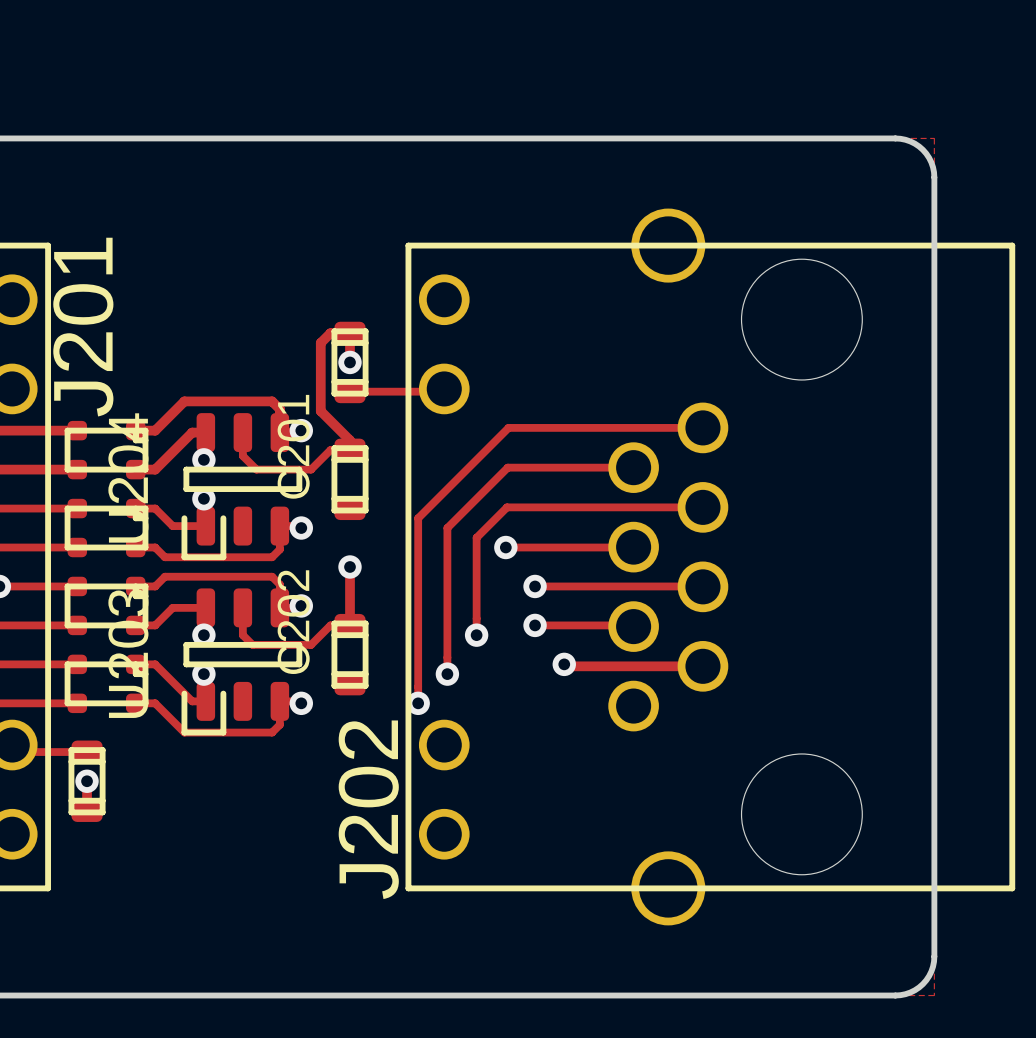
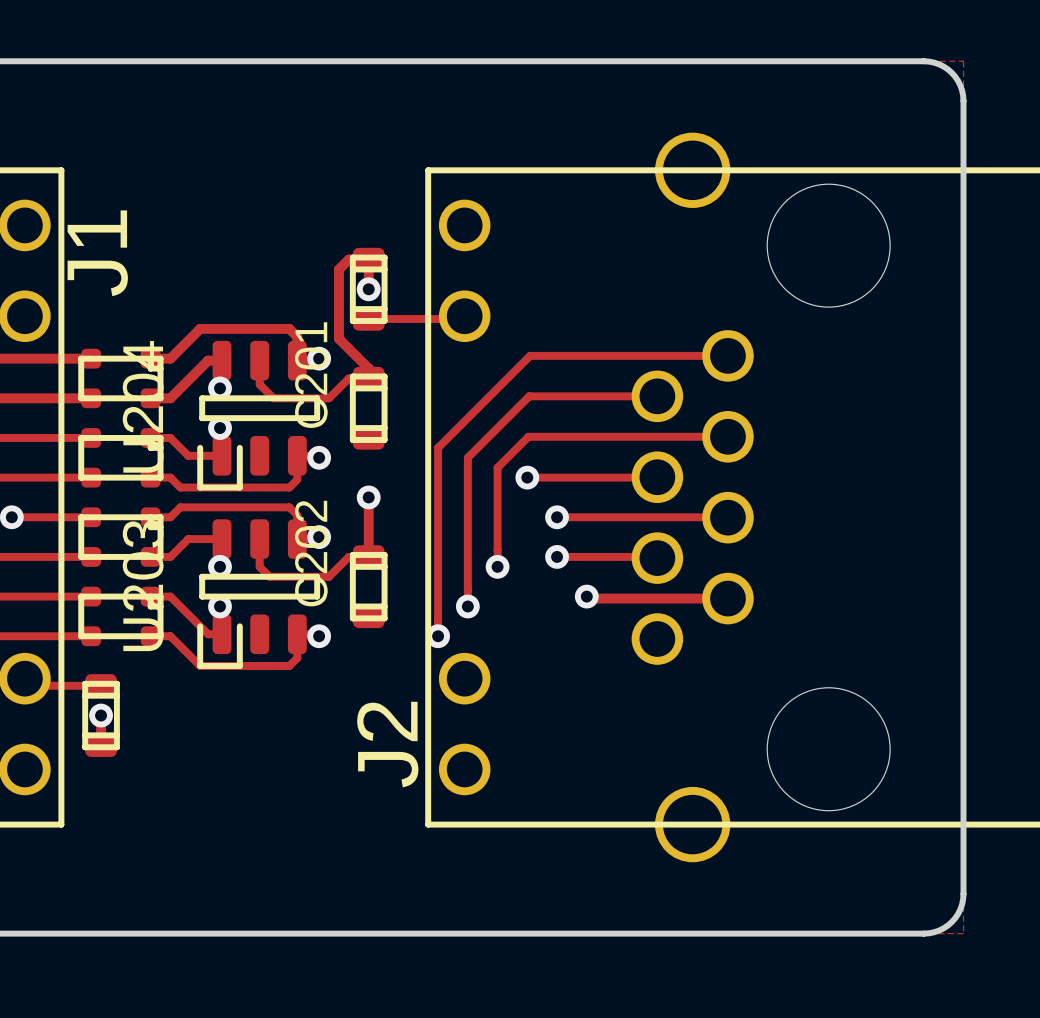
J201 name: J201 (83, 327) -> J1 (97, 253)
J202 name: J202 (368, 809) -> J2 (387, 744)

